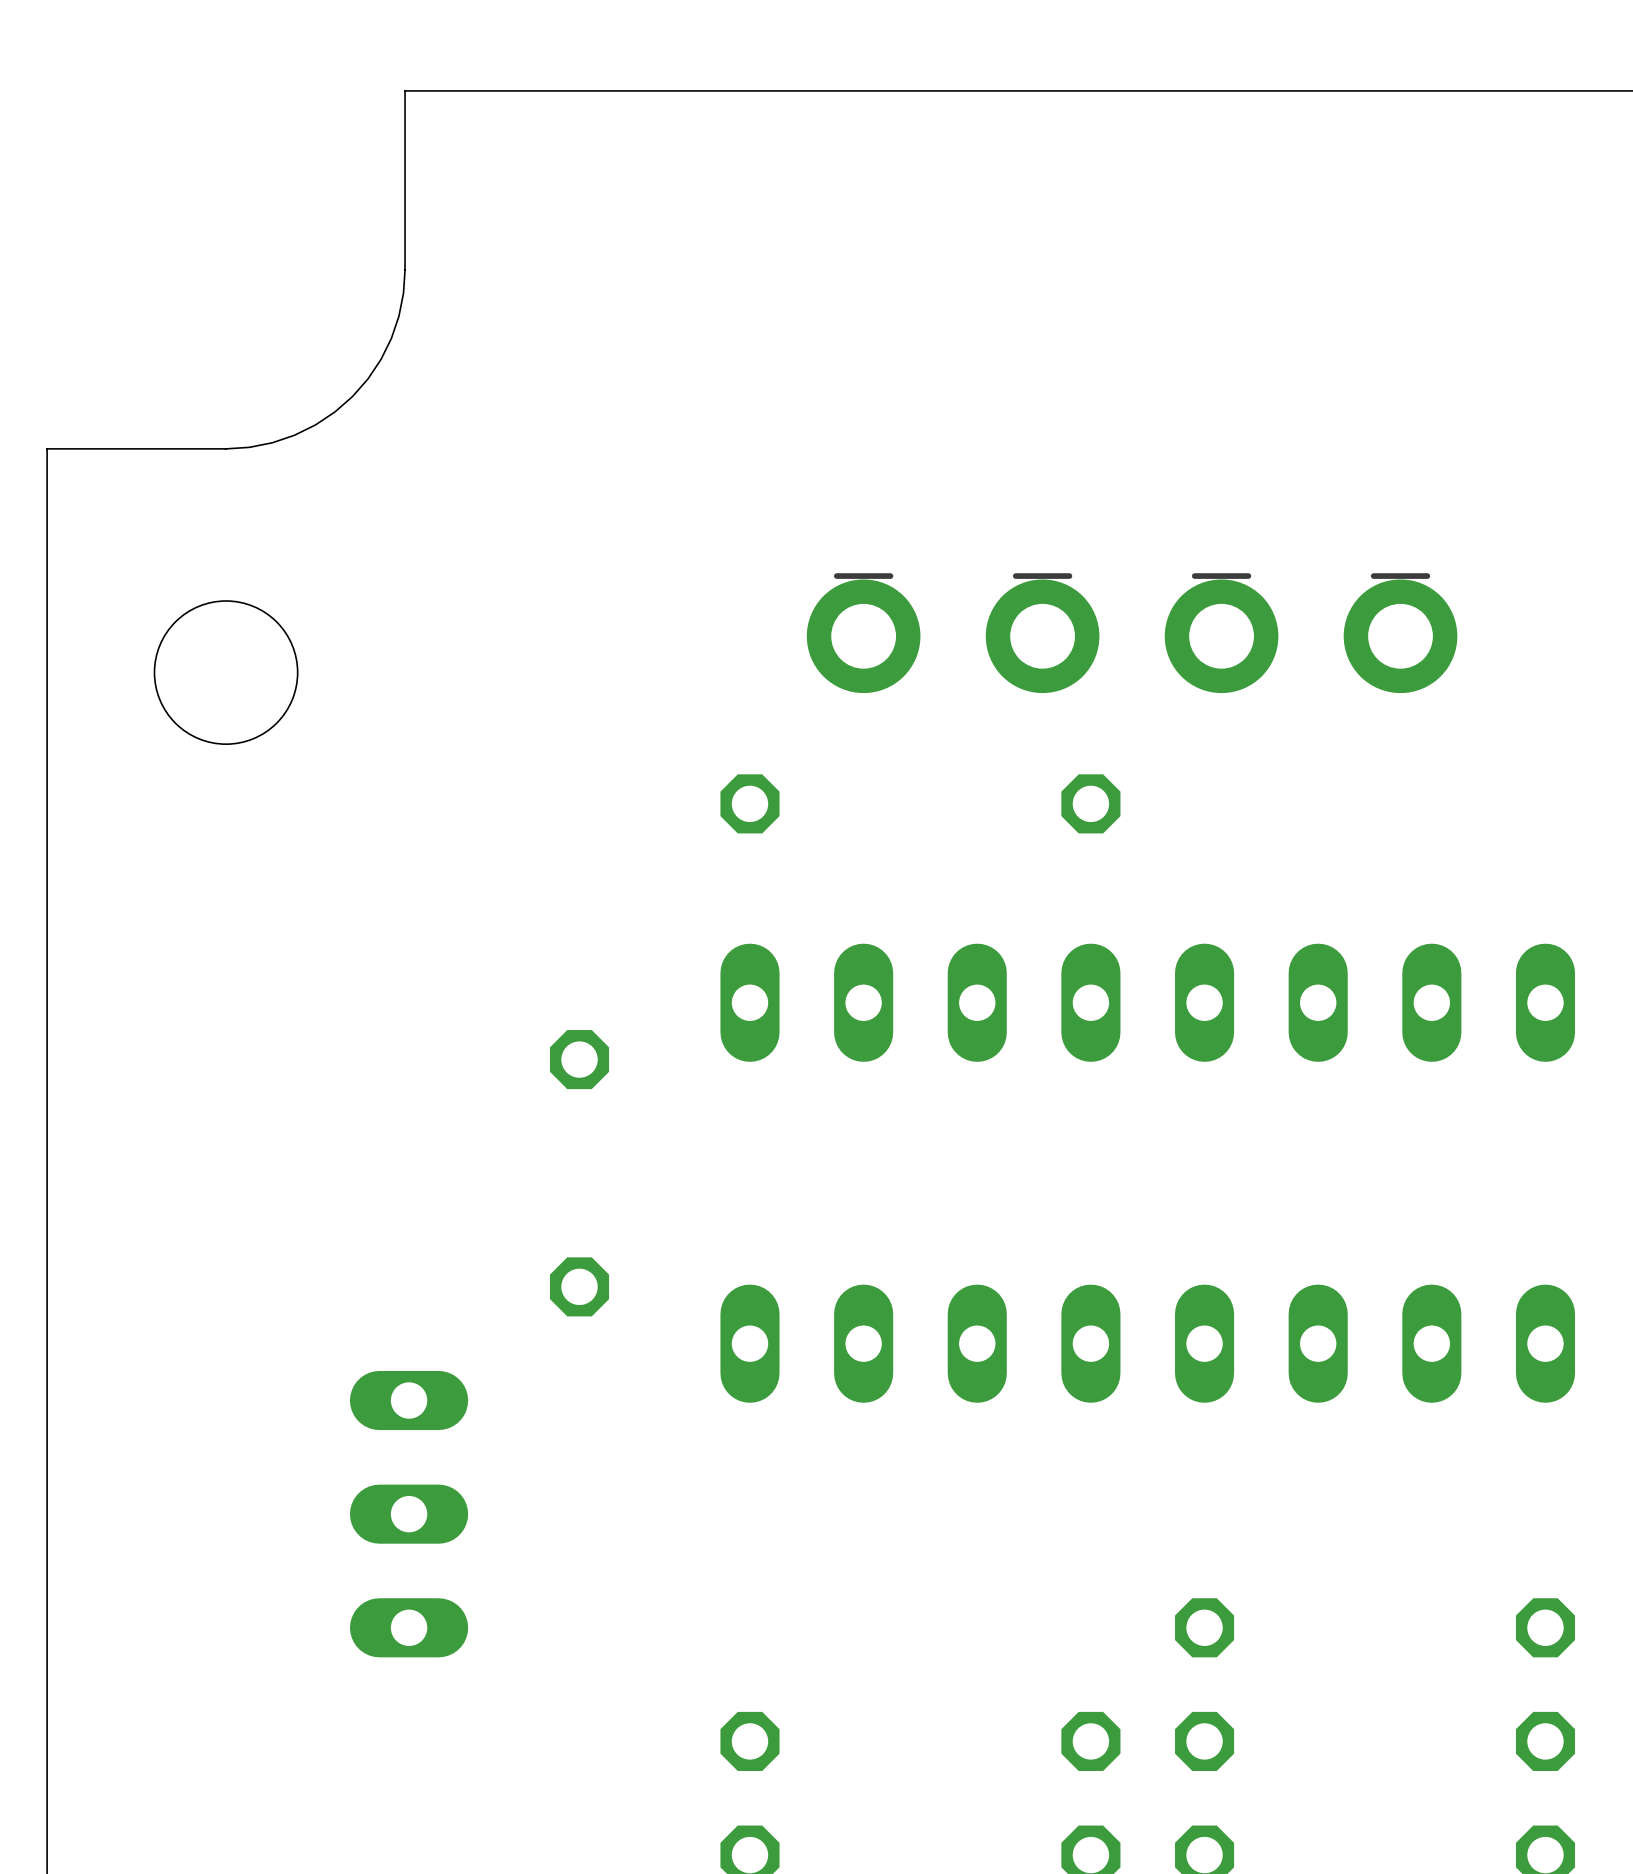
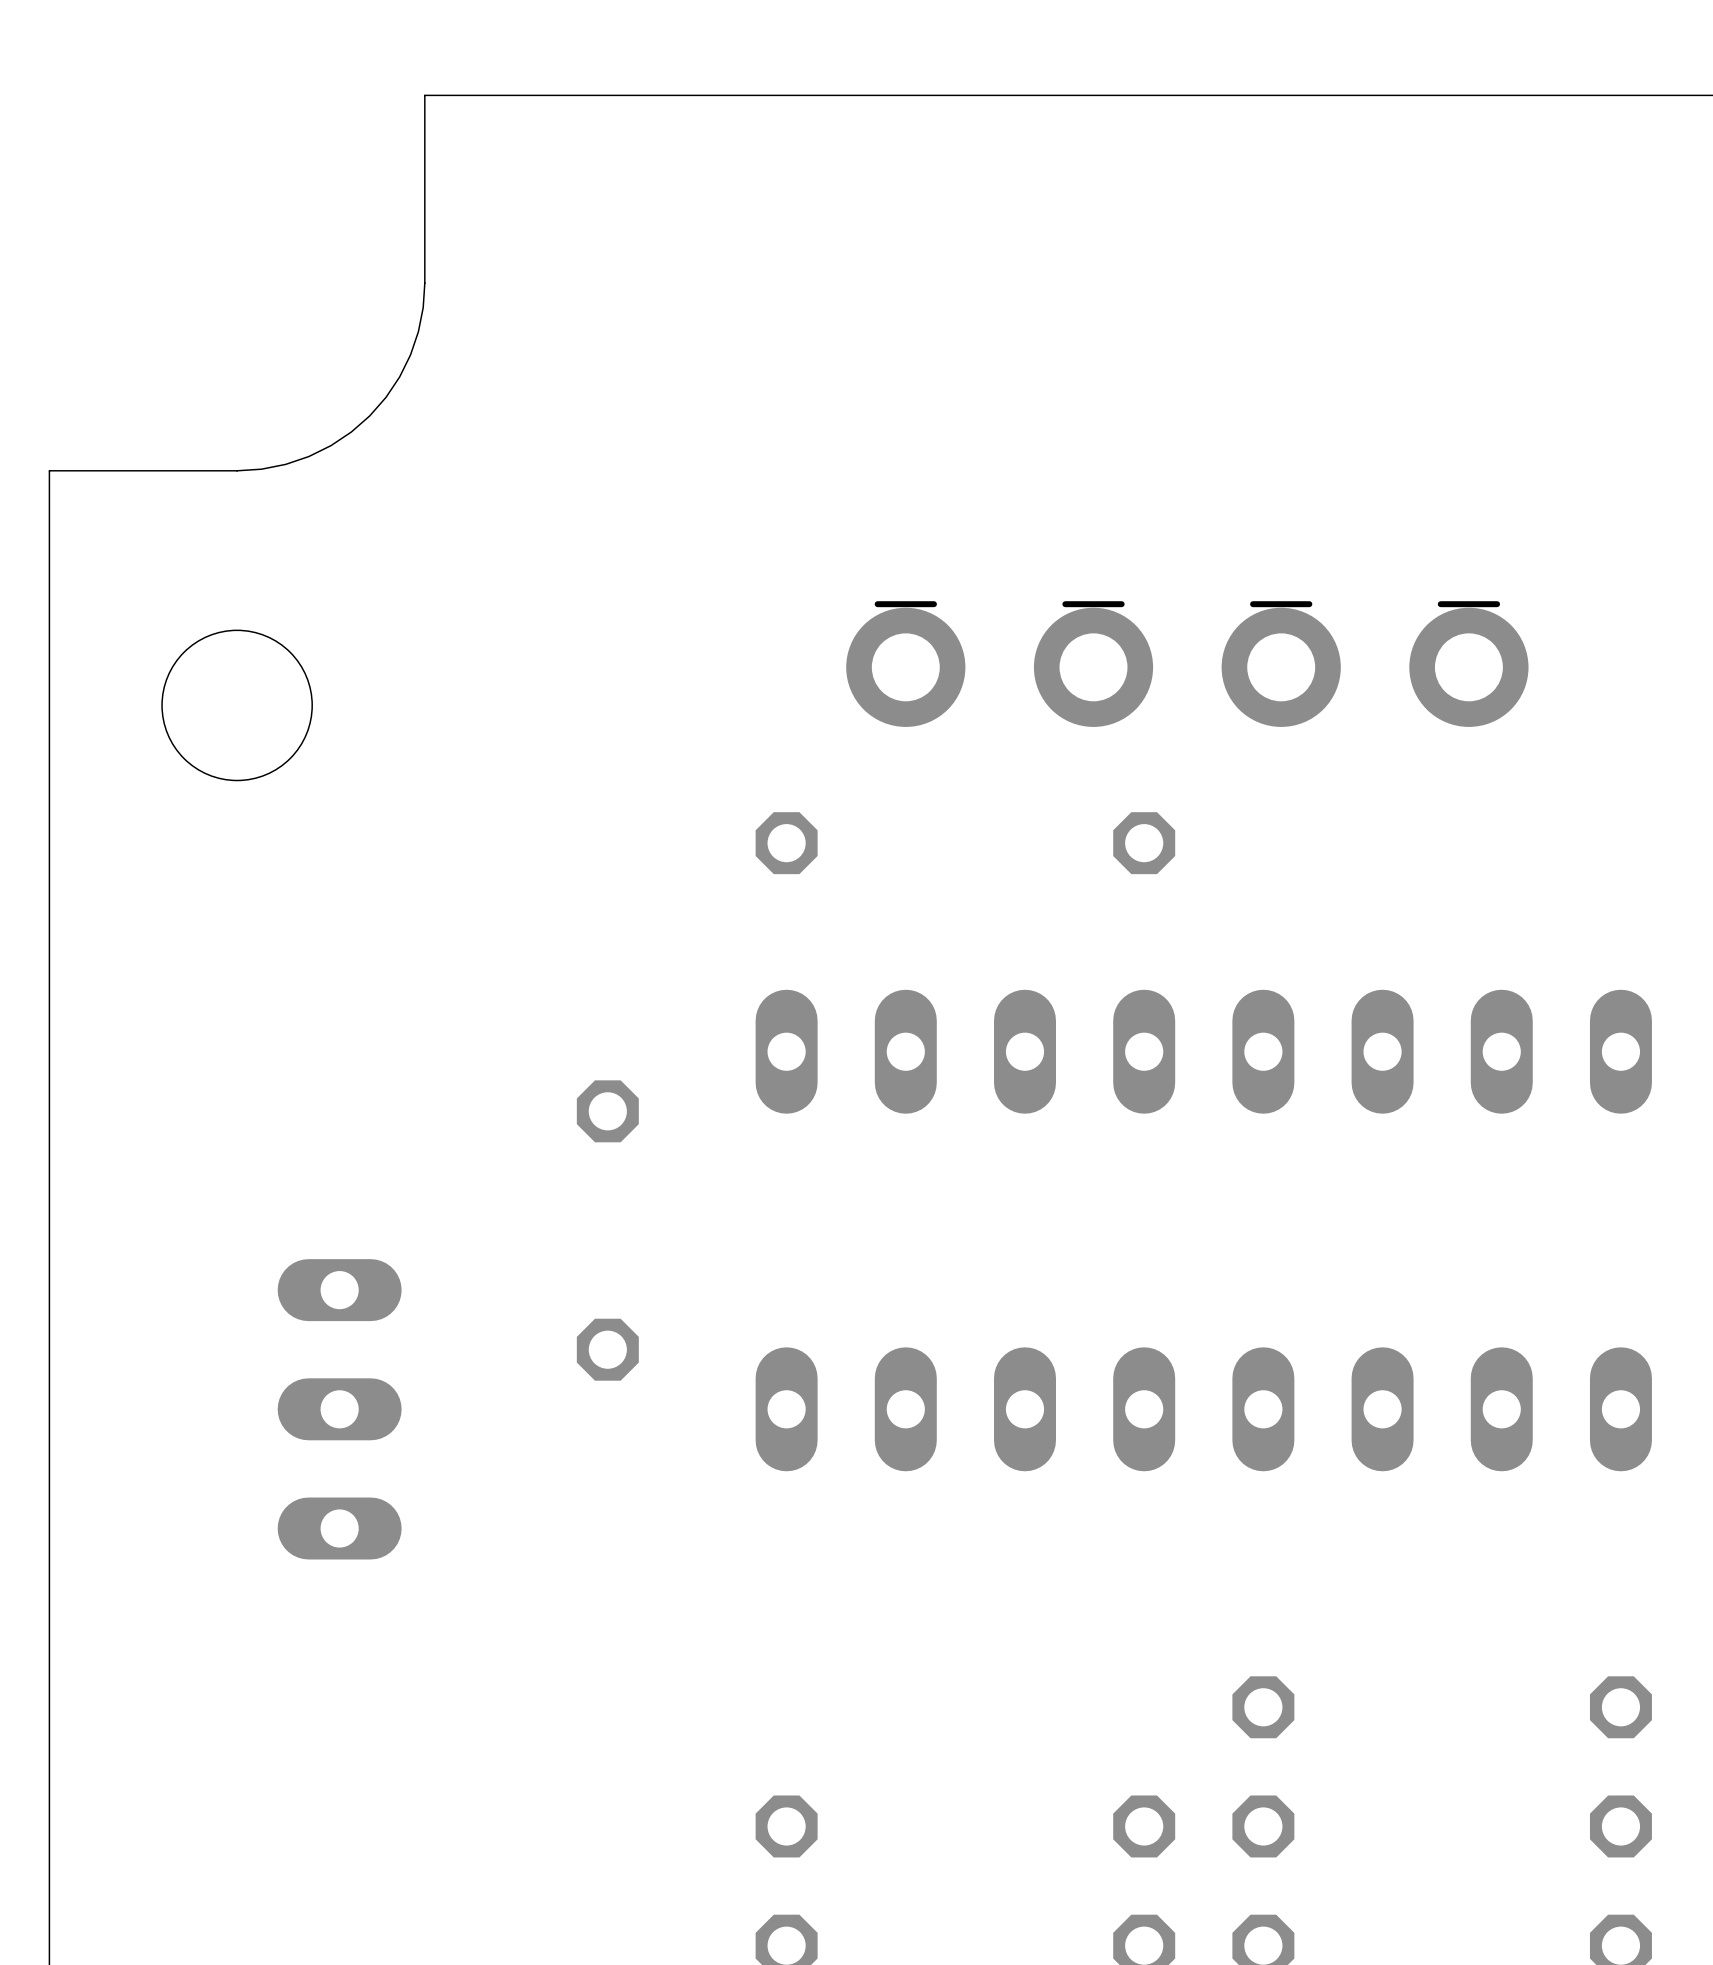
part position: (409, 1514) -> (339, 1409)

